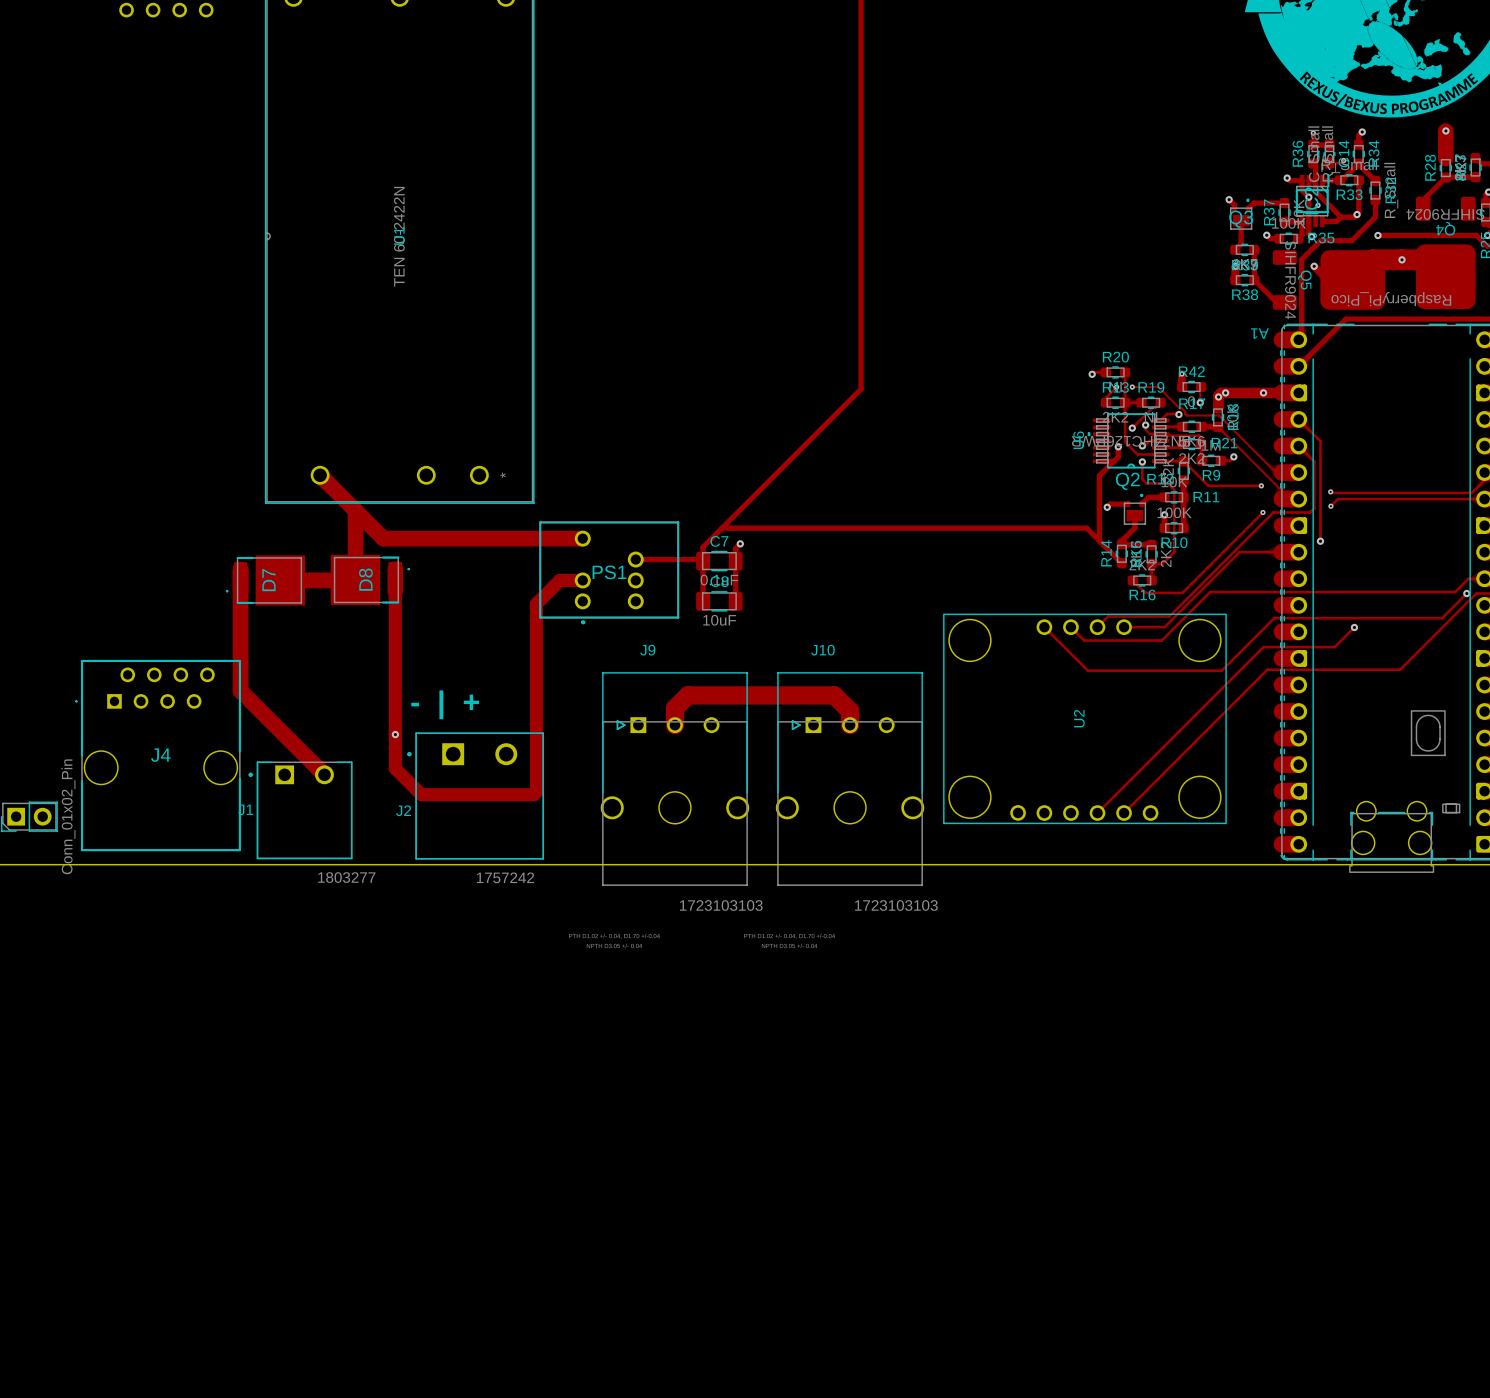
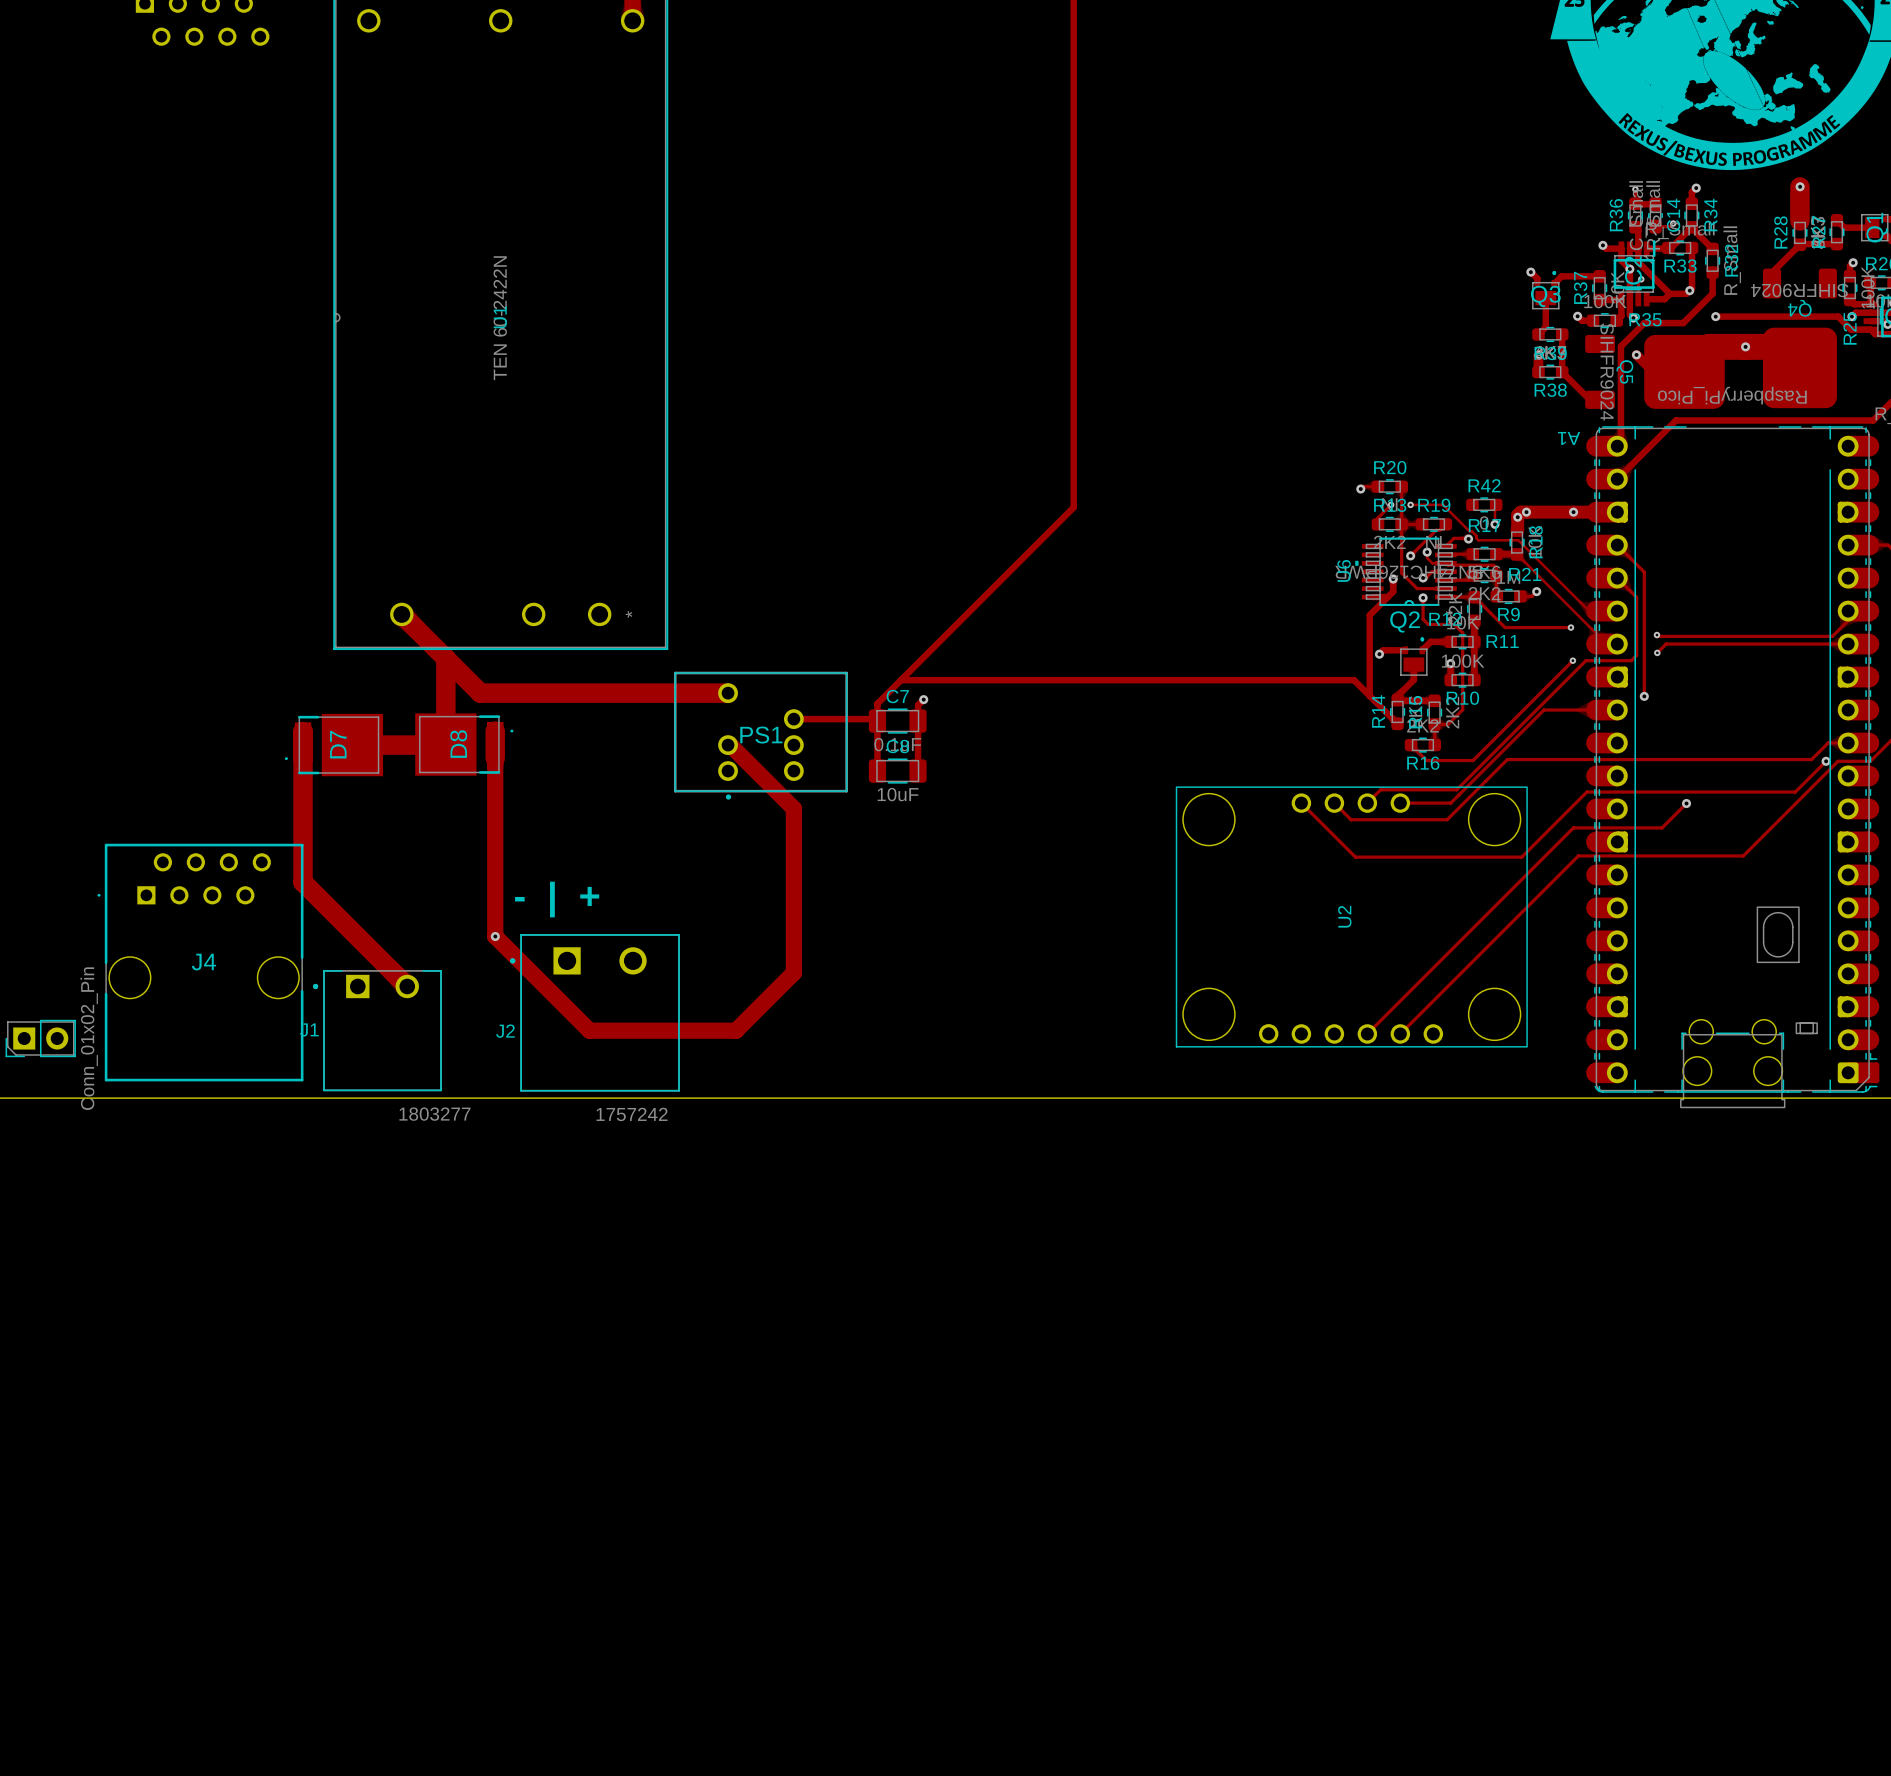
track: (1181, 373) (1181, 386) -> none
via: (1181, 373) -> none
track: (582, 580) (559, 580) (536, 603) (536, 792) (533, 794) (421, 794) (395, 768) (395, 734) -> (730, 745) (793, 808) (793, 972) (736, 1030) (589, 1030) (495, 936)
track: (674, 725) (674, 708) (688, 695) (834, 695) (850, 711) (850, 725) -> none
J9: 1723103103 (674, 779) -> none
J10: 1723103103 (850, 779) -> none

